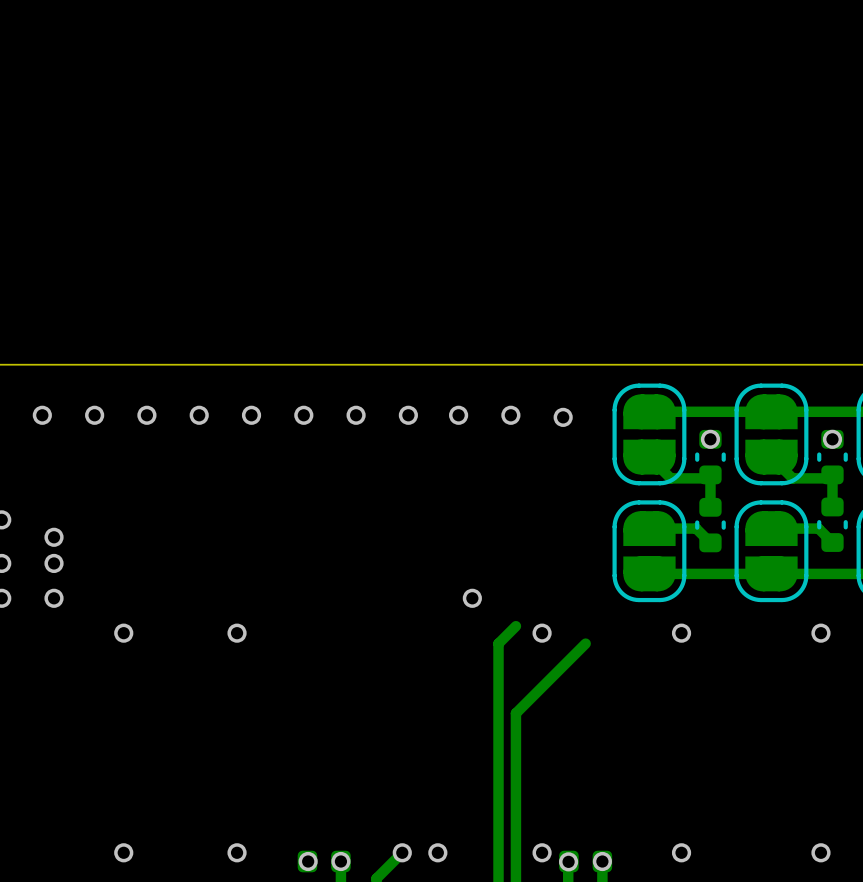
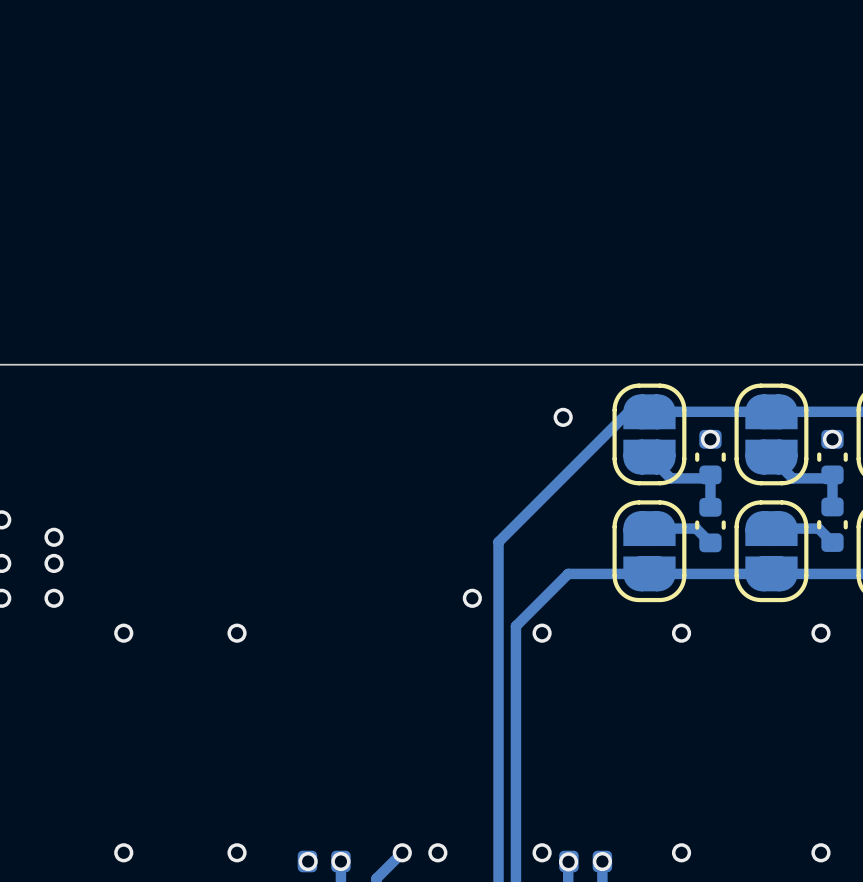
via: (42, 415) -> none
via: (94, 415) -> none
via: (146, 415) -> none
via: (199, 415) -> none
via: (251, 415) -> none
via: (303, 415) -> none
via: (356, 415) -> none
via: (408, 415) -> none
via: (458, 415) -> none
via: (510, 415) -> none
track: (515, 626) (498, 643) -> (649, 411) (628, 411) (498, 542) (498, 643)
track: (585, 643) (515, 713) -> (649, 573) (568, 573) (515, 626) (515, 713)

